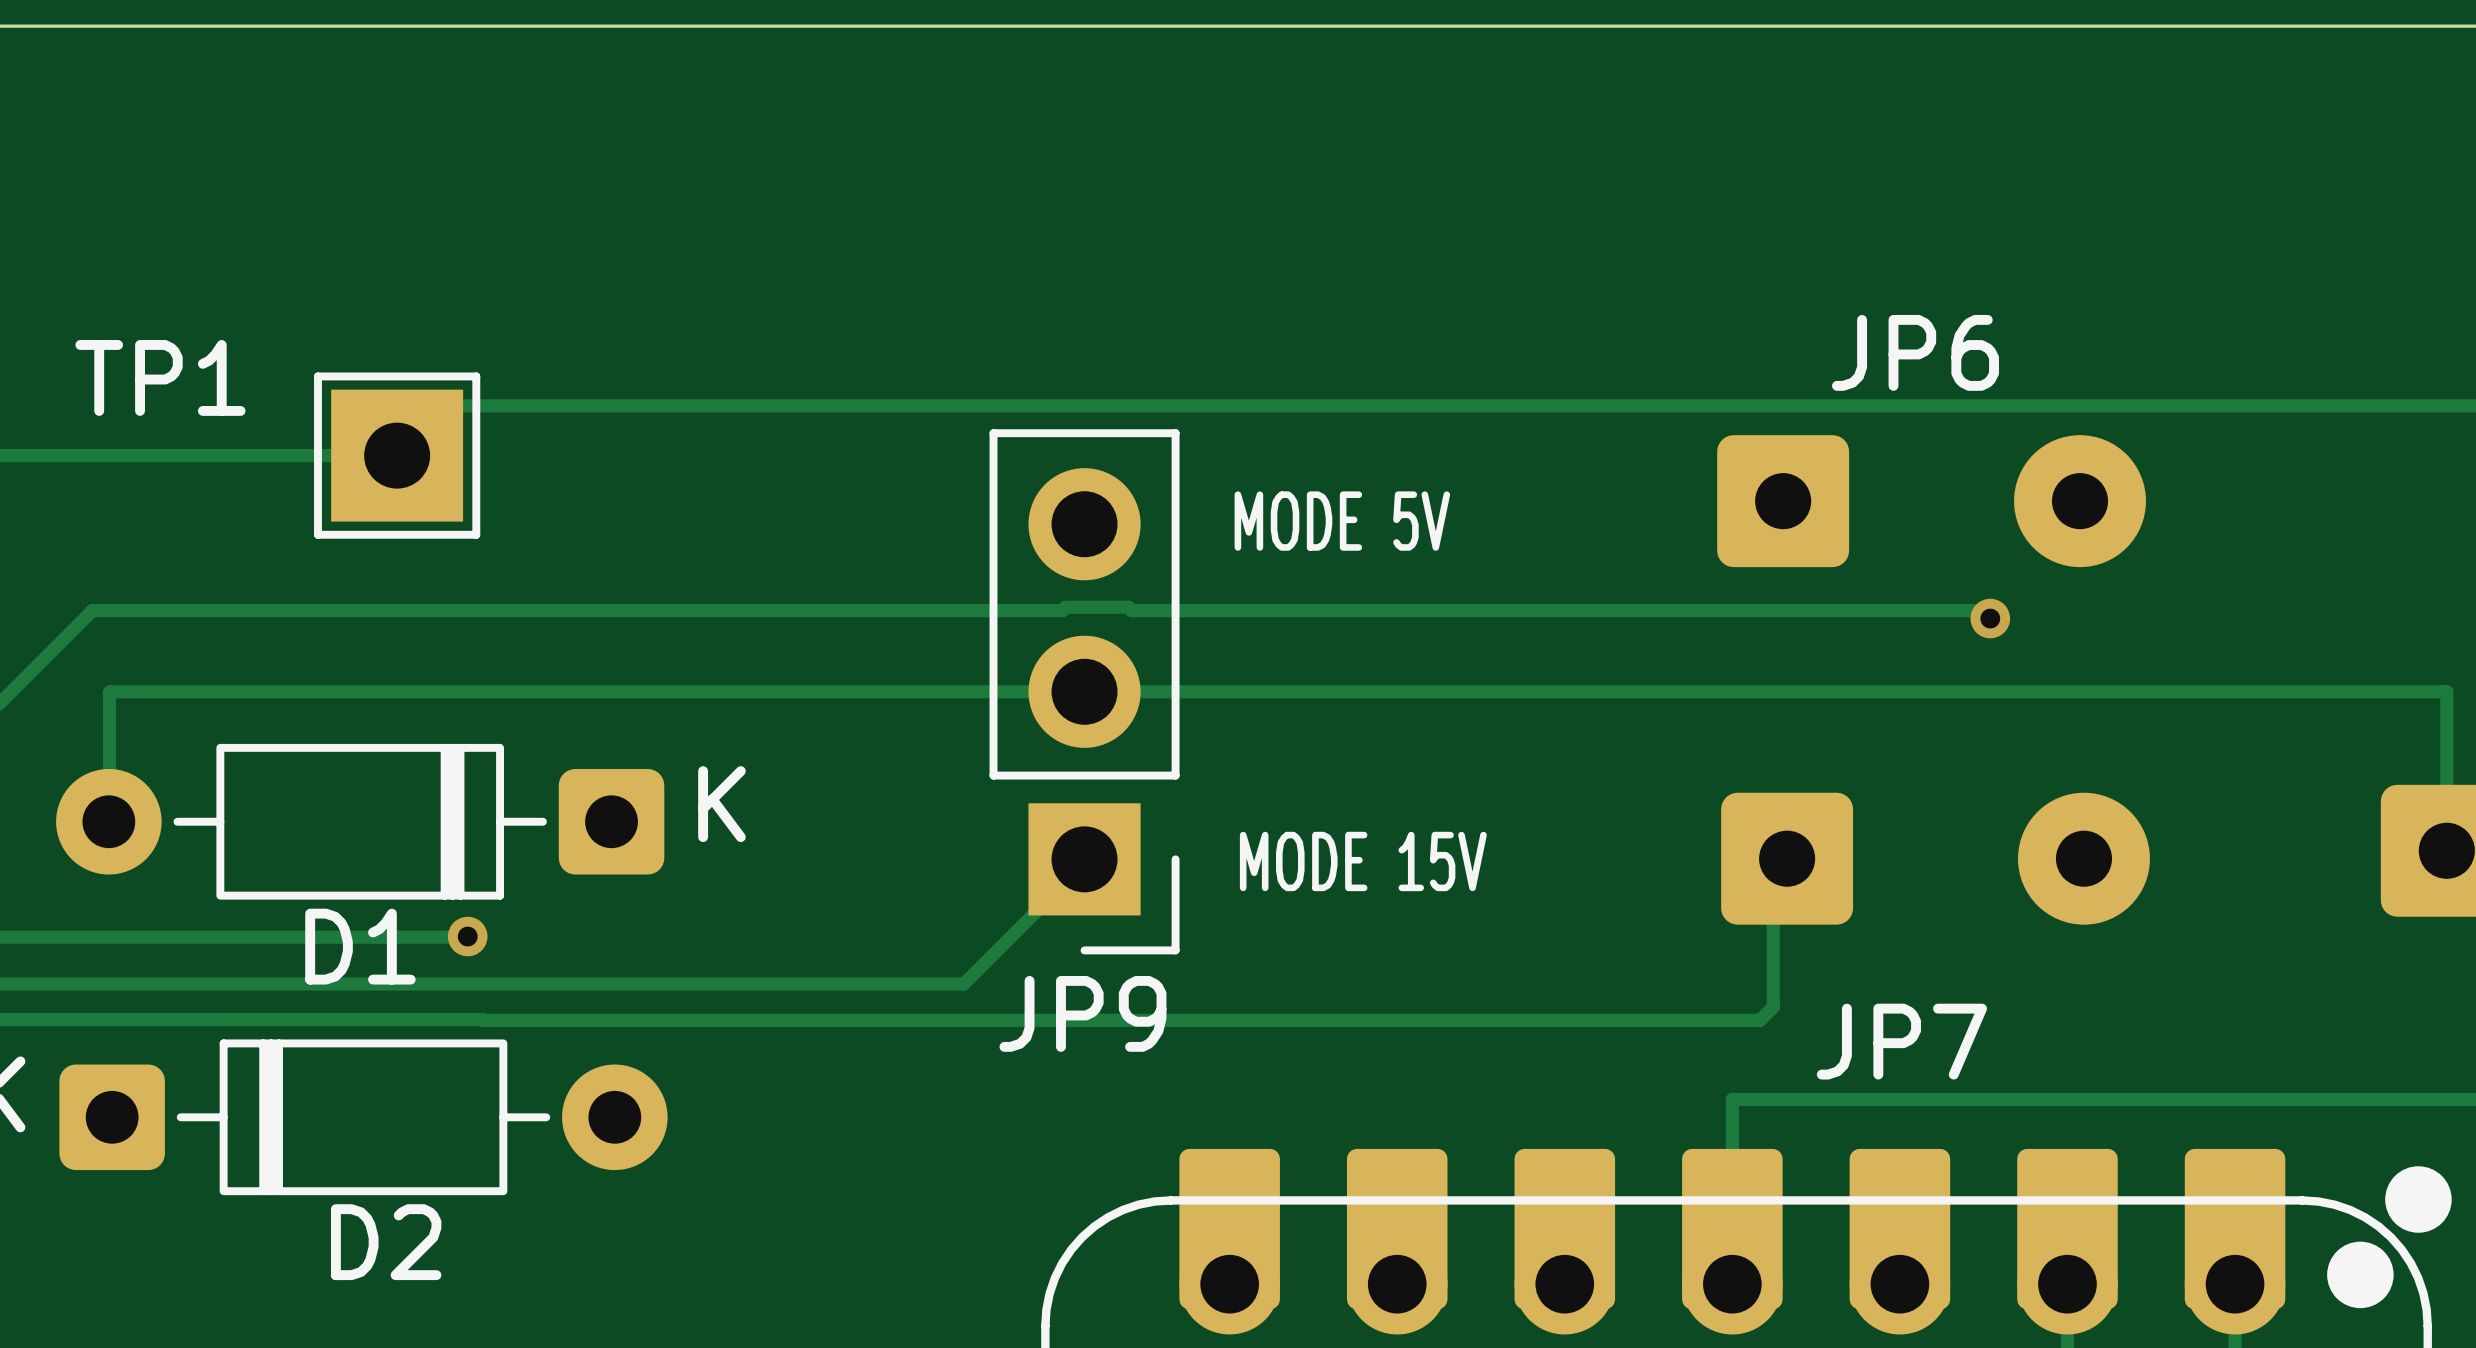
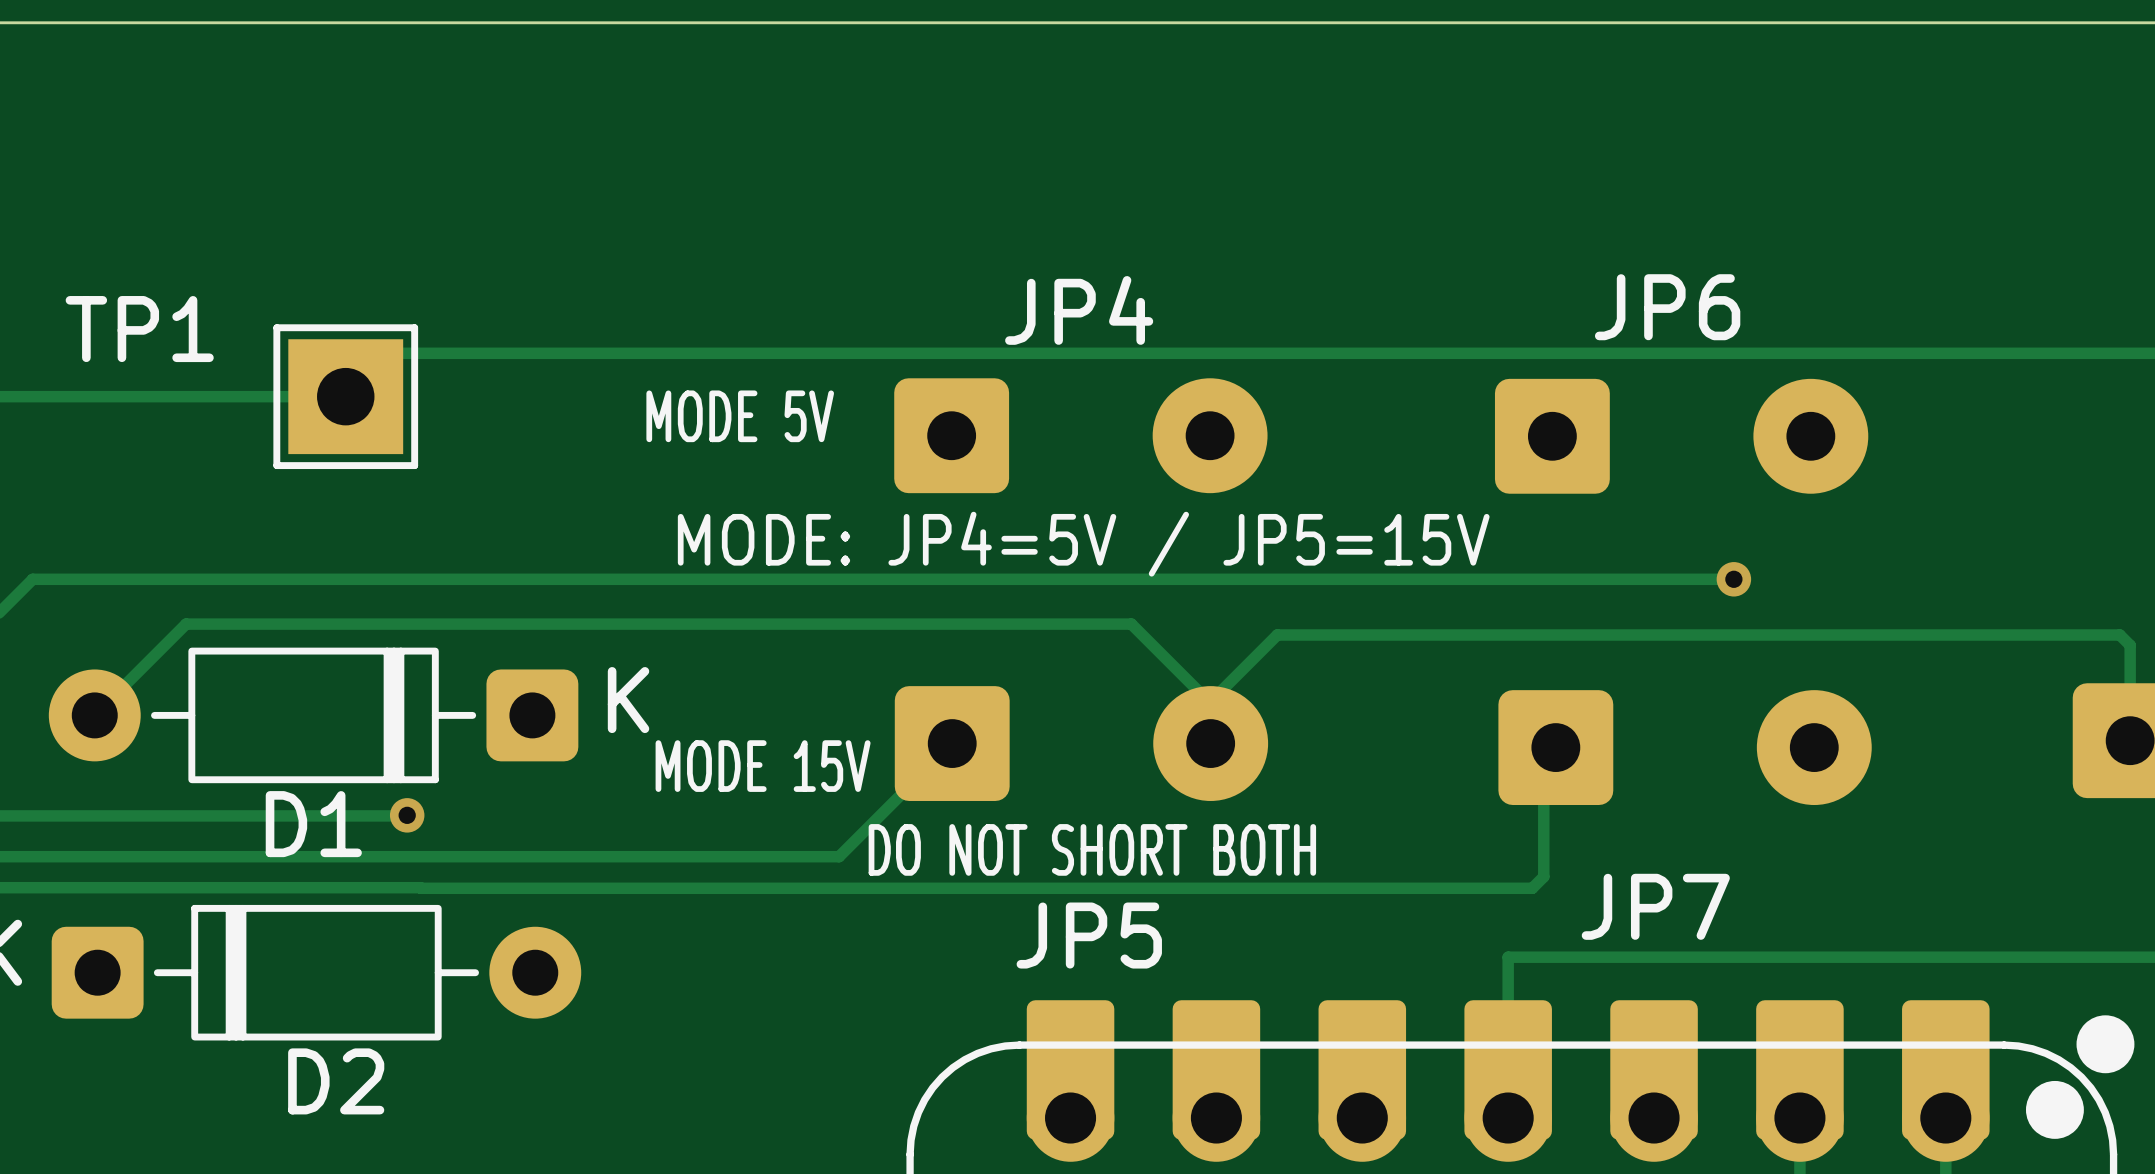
JP4: none -> (1080, 435)
text position: MODE 5V (1342, 521) -> MODE 5V (740, 416)
track: (1990, 618) (1982, 610) (1131, 610) (1128, 607) (1065, 607) (1062, 610) (92, 610) (37, 665) -> (1733, 579) (32, 579)
via position: (1990, 618) -> (1733, 579)
text: none -> MODE: JP4=5V / JP5=15V (1083, 544)
track: (110, 691) (2446, 691) (2446, 741) -> (1210, 743) (1210, 701) (1277, 635) (2119, 635) (2130, 645)
JP9: (1084, 691) -> none
track: (109, 692) (109, 821) -> (1210, 703) (1131, 624) (186, 624) (95, 714)
JP5: none -> (1081, 743)
text position: MODE 15V (1363, 861) -> MODE 15V (763, 766)
text: none -> DO NOT SHORT BOTH (1092, 849)

